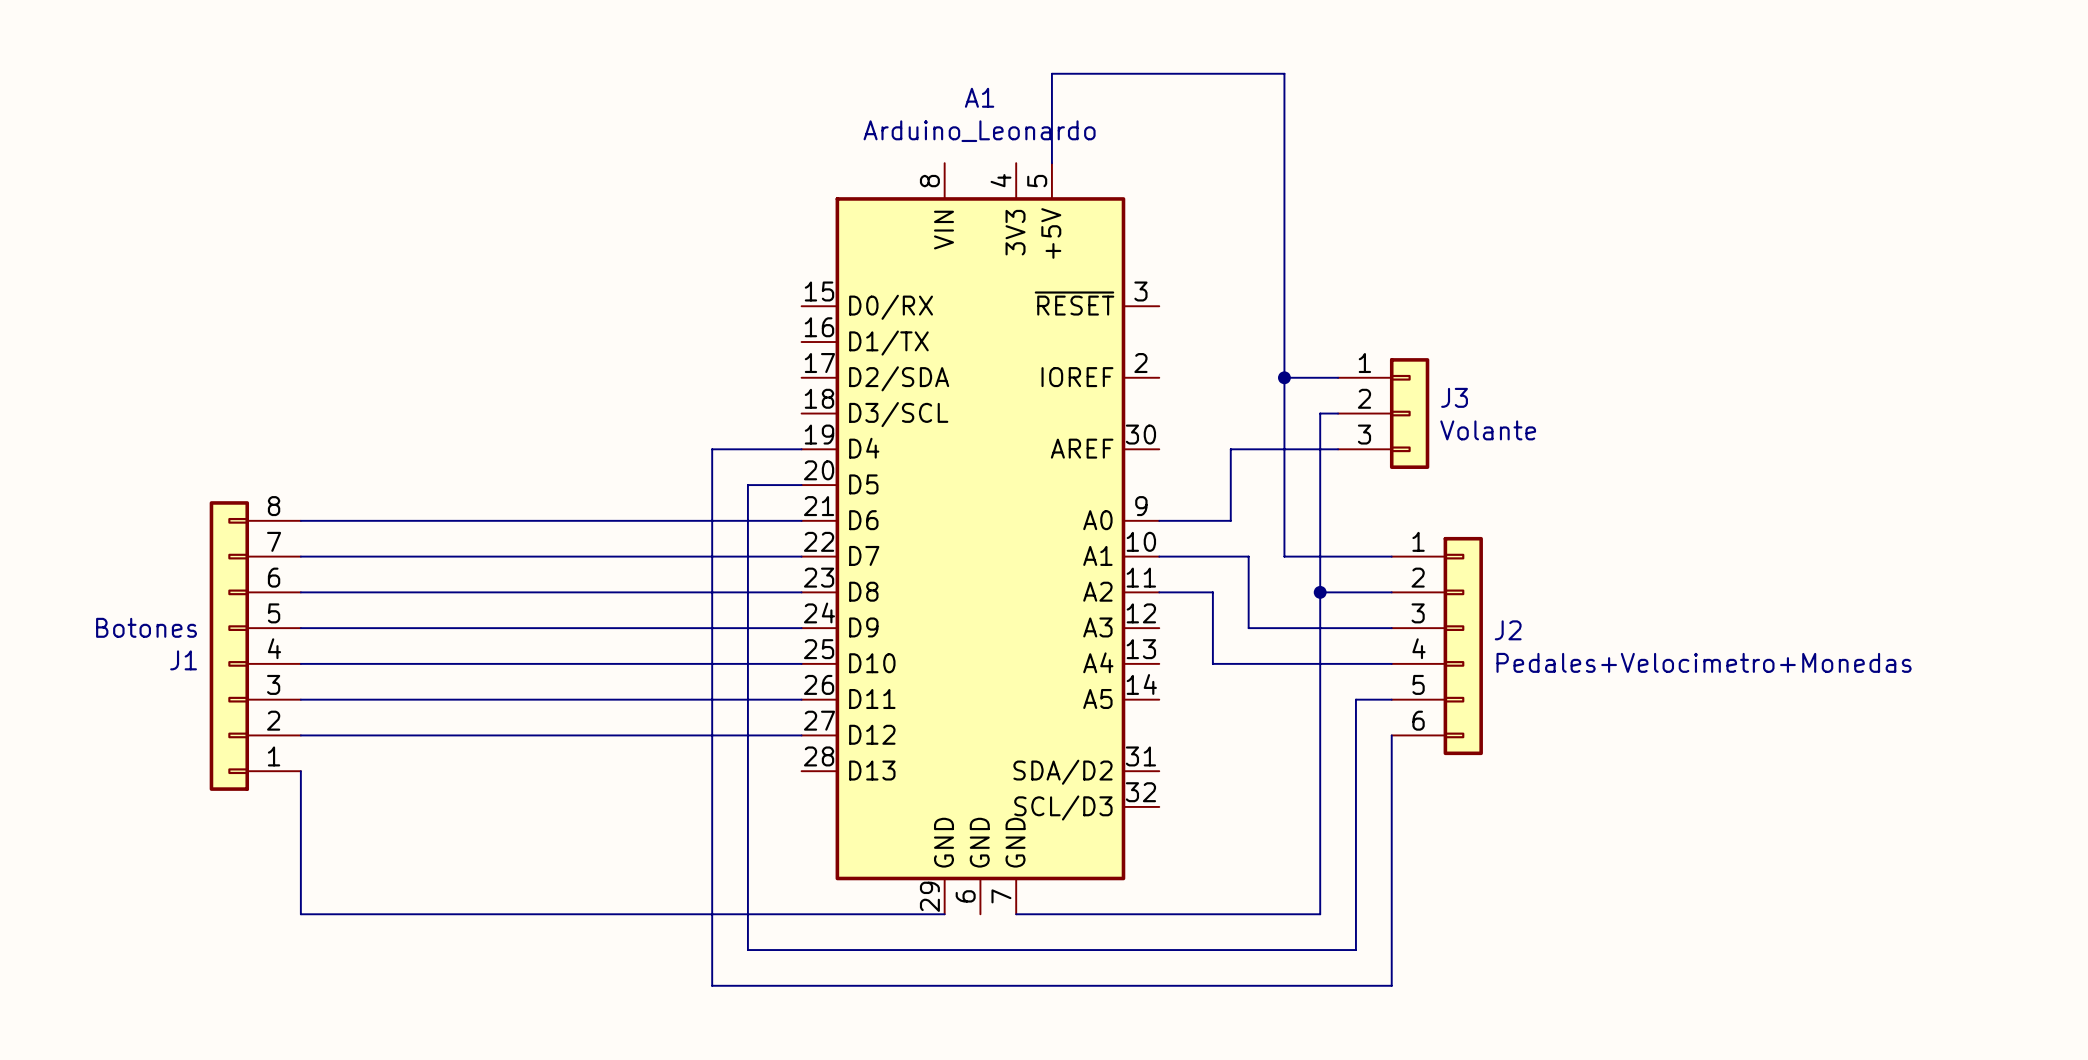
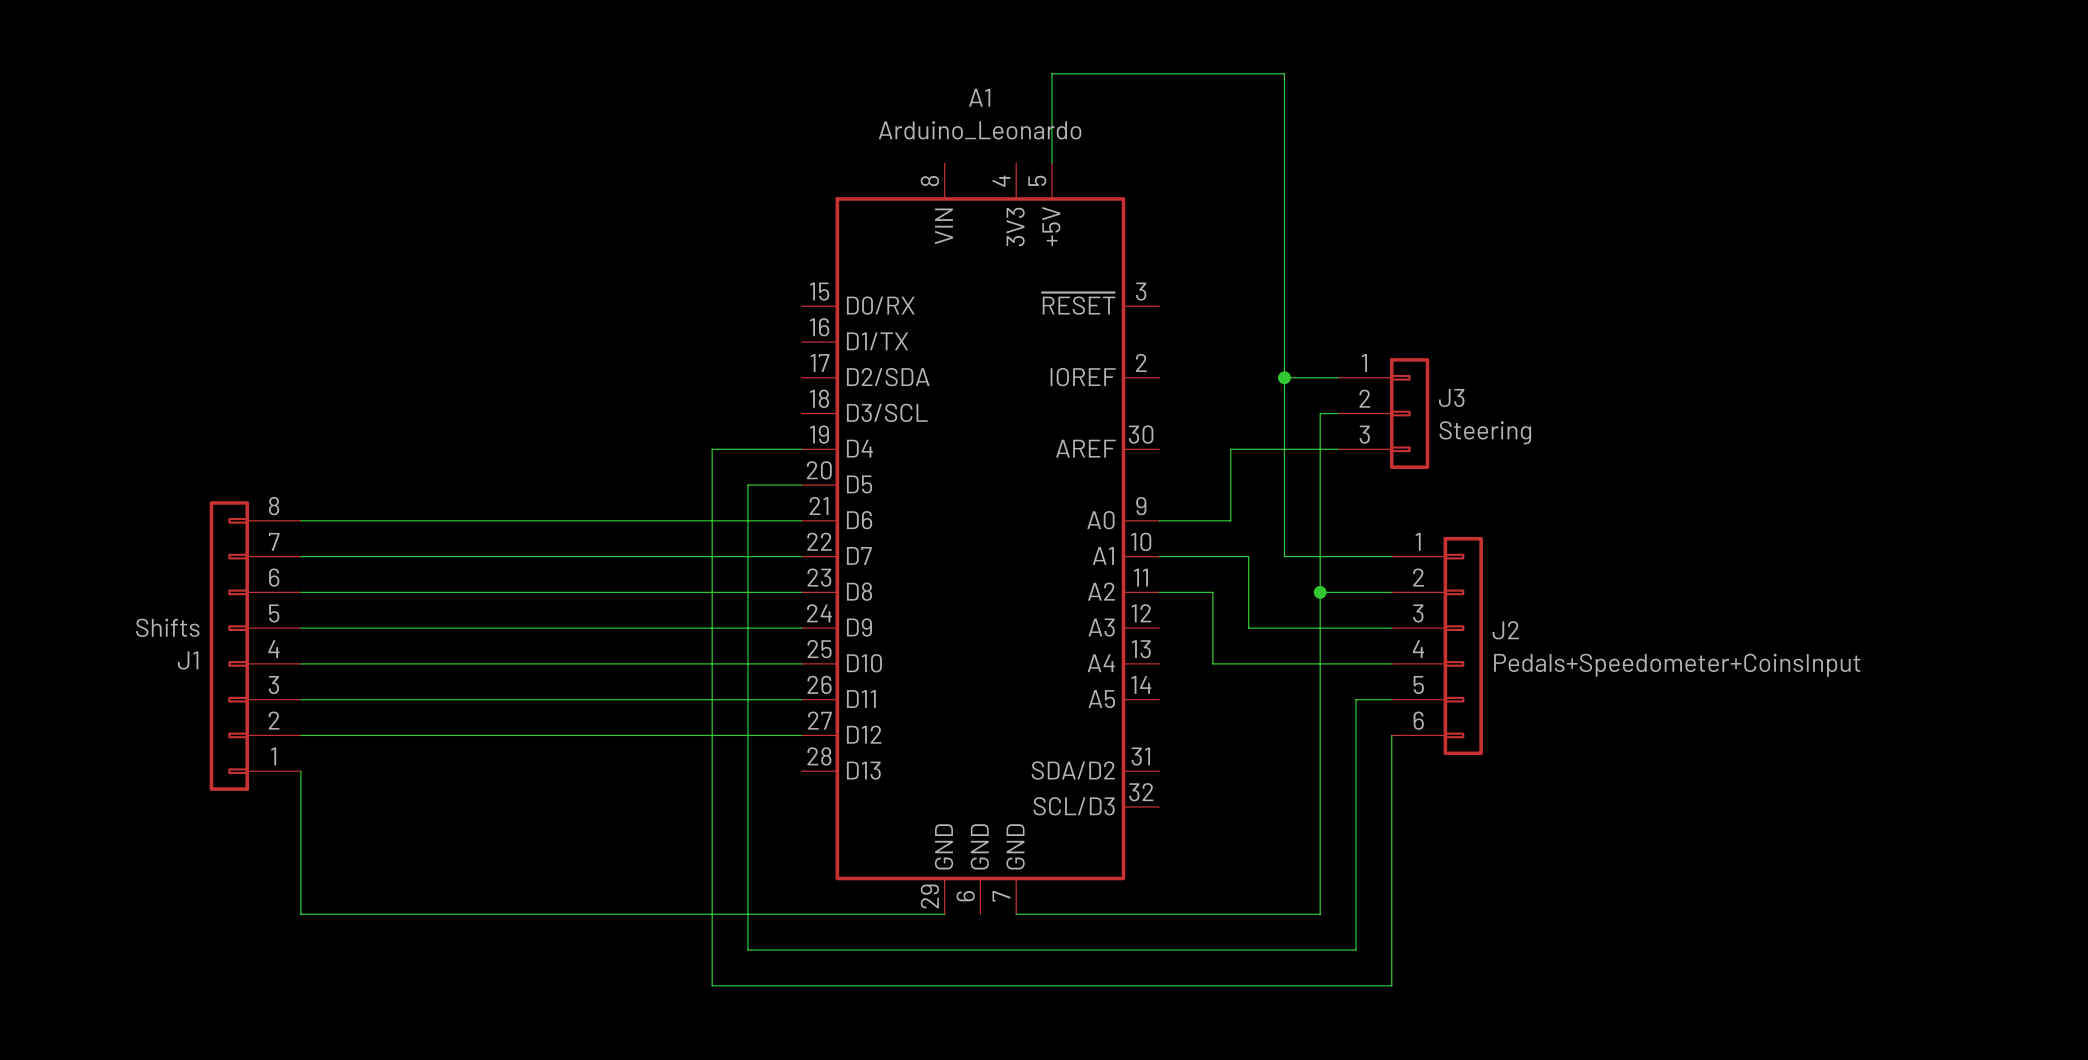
J3 value: Volante (1488, 430) -> Steering (1485, 432)
J1 value: Botones (146, 627) -> Shifts (167, 627)
J2 value: Pedales+Velocimetro+Monedas (1704, 662) -> Pedals+Speedometer+CoinsInput (1677, 665)

